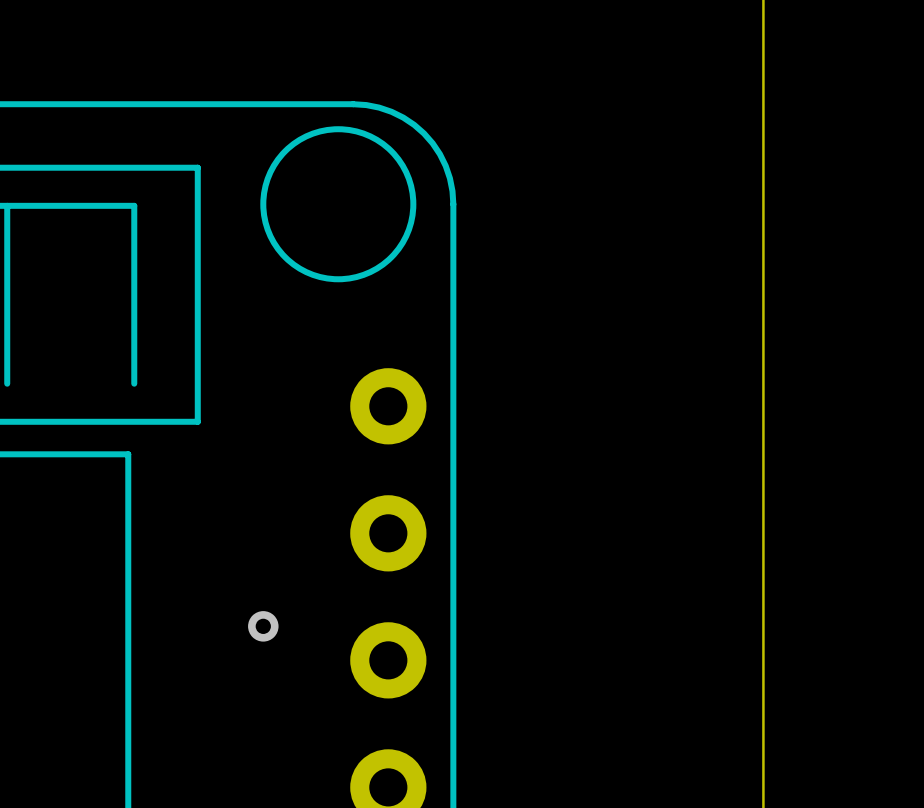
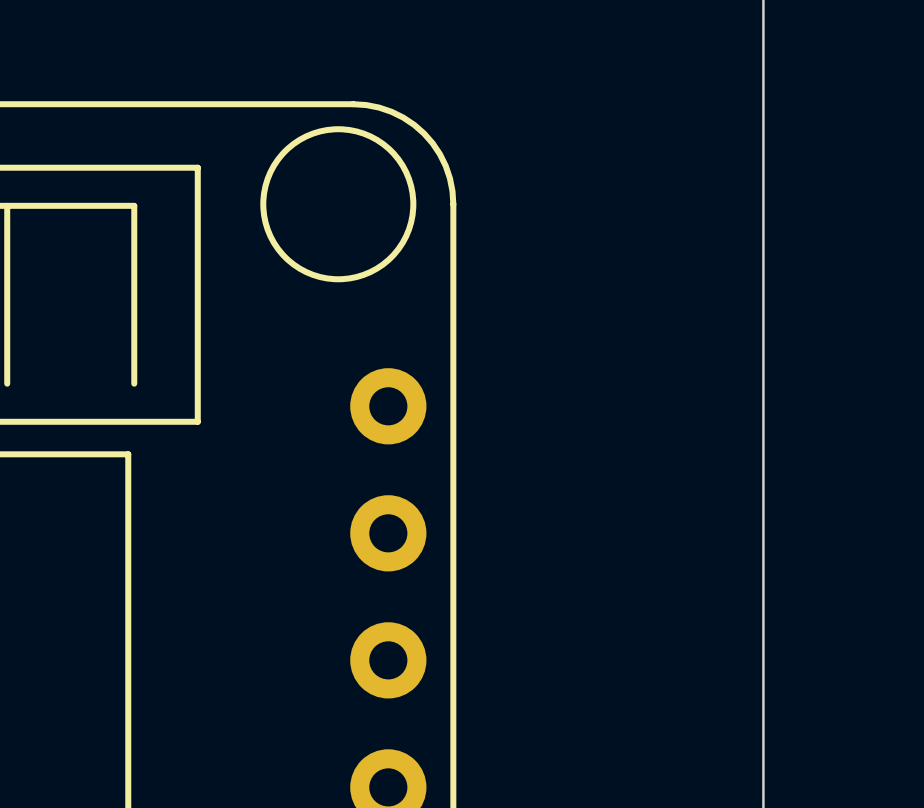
via: (263, 626) -> none

